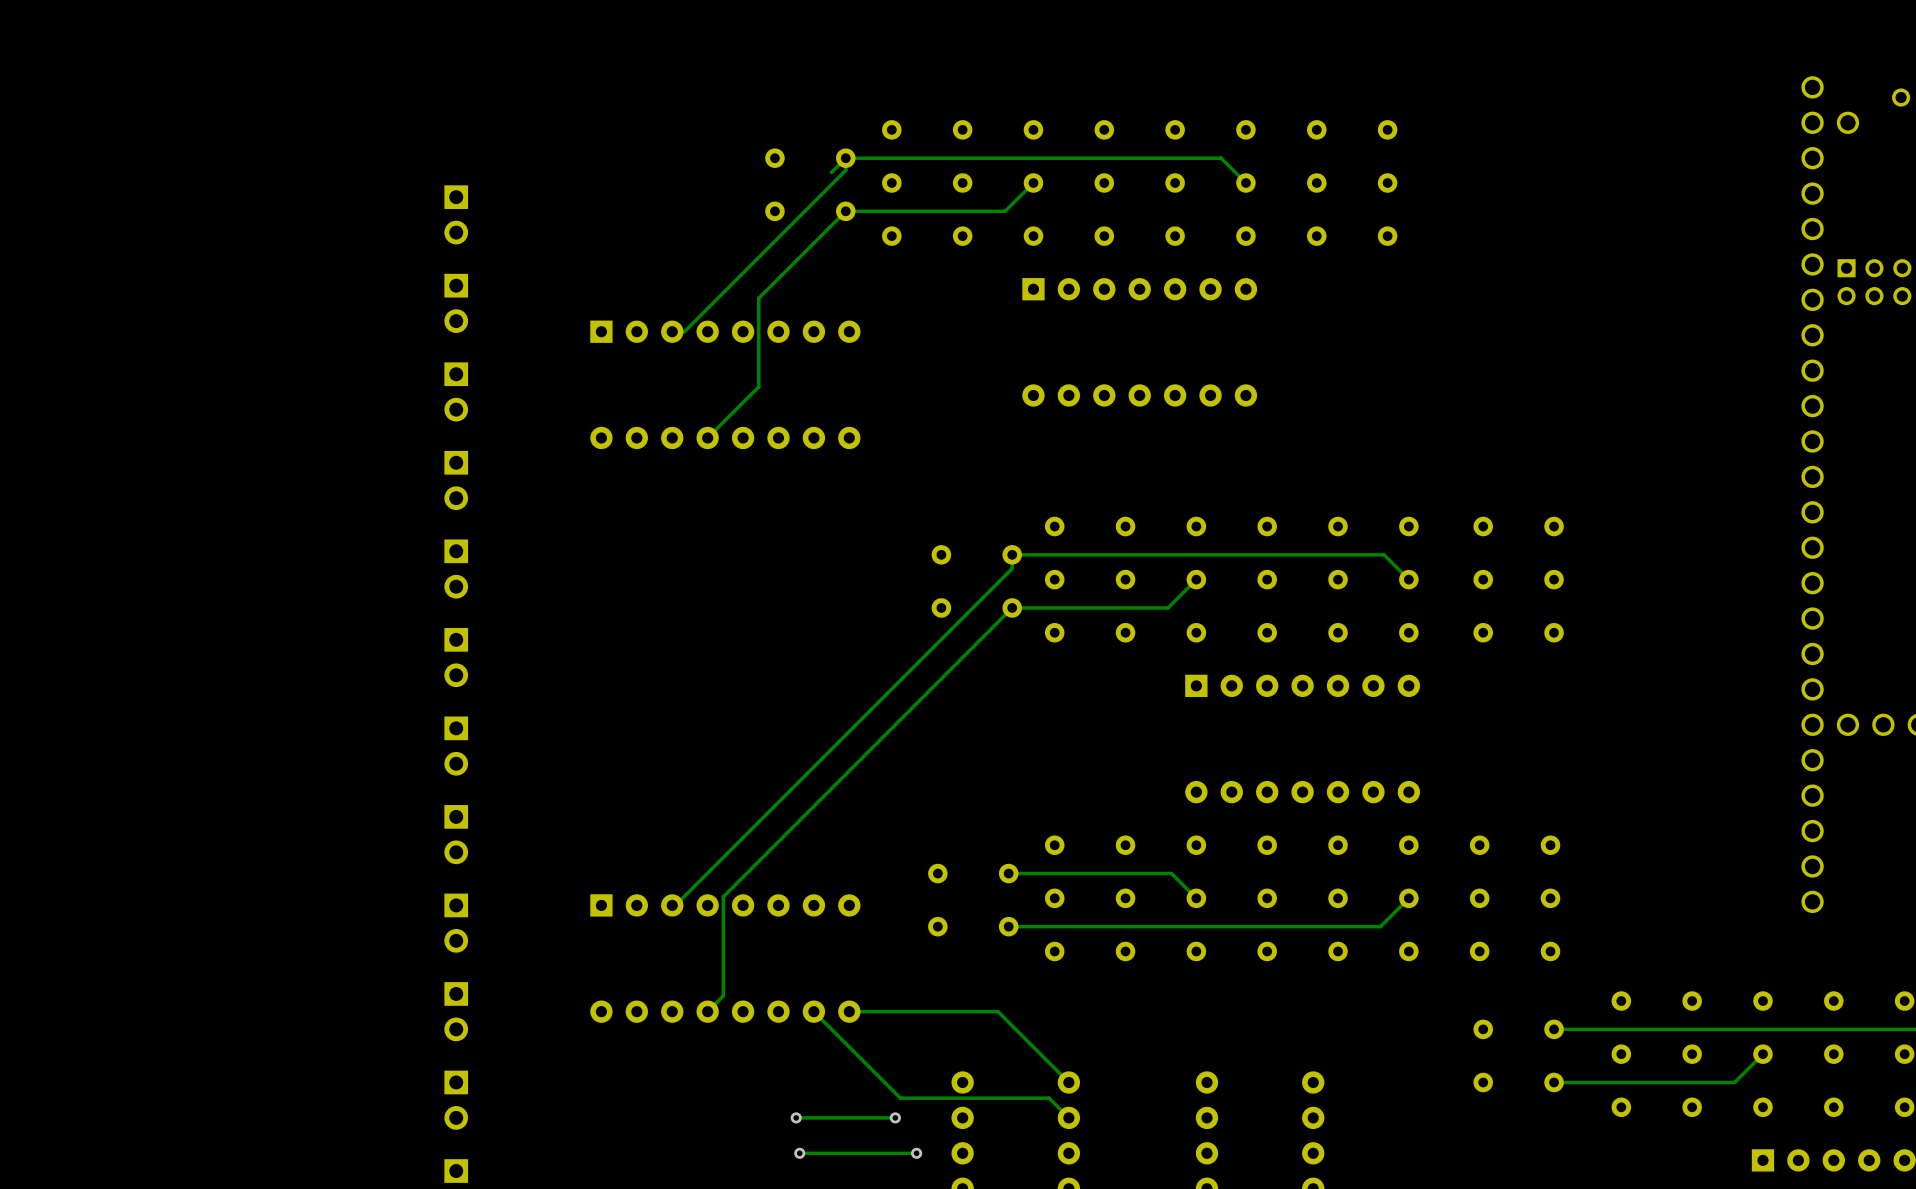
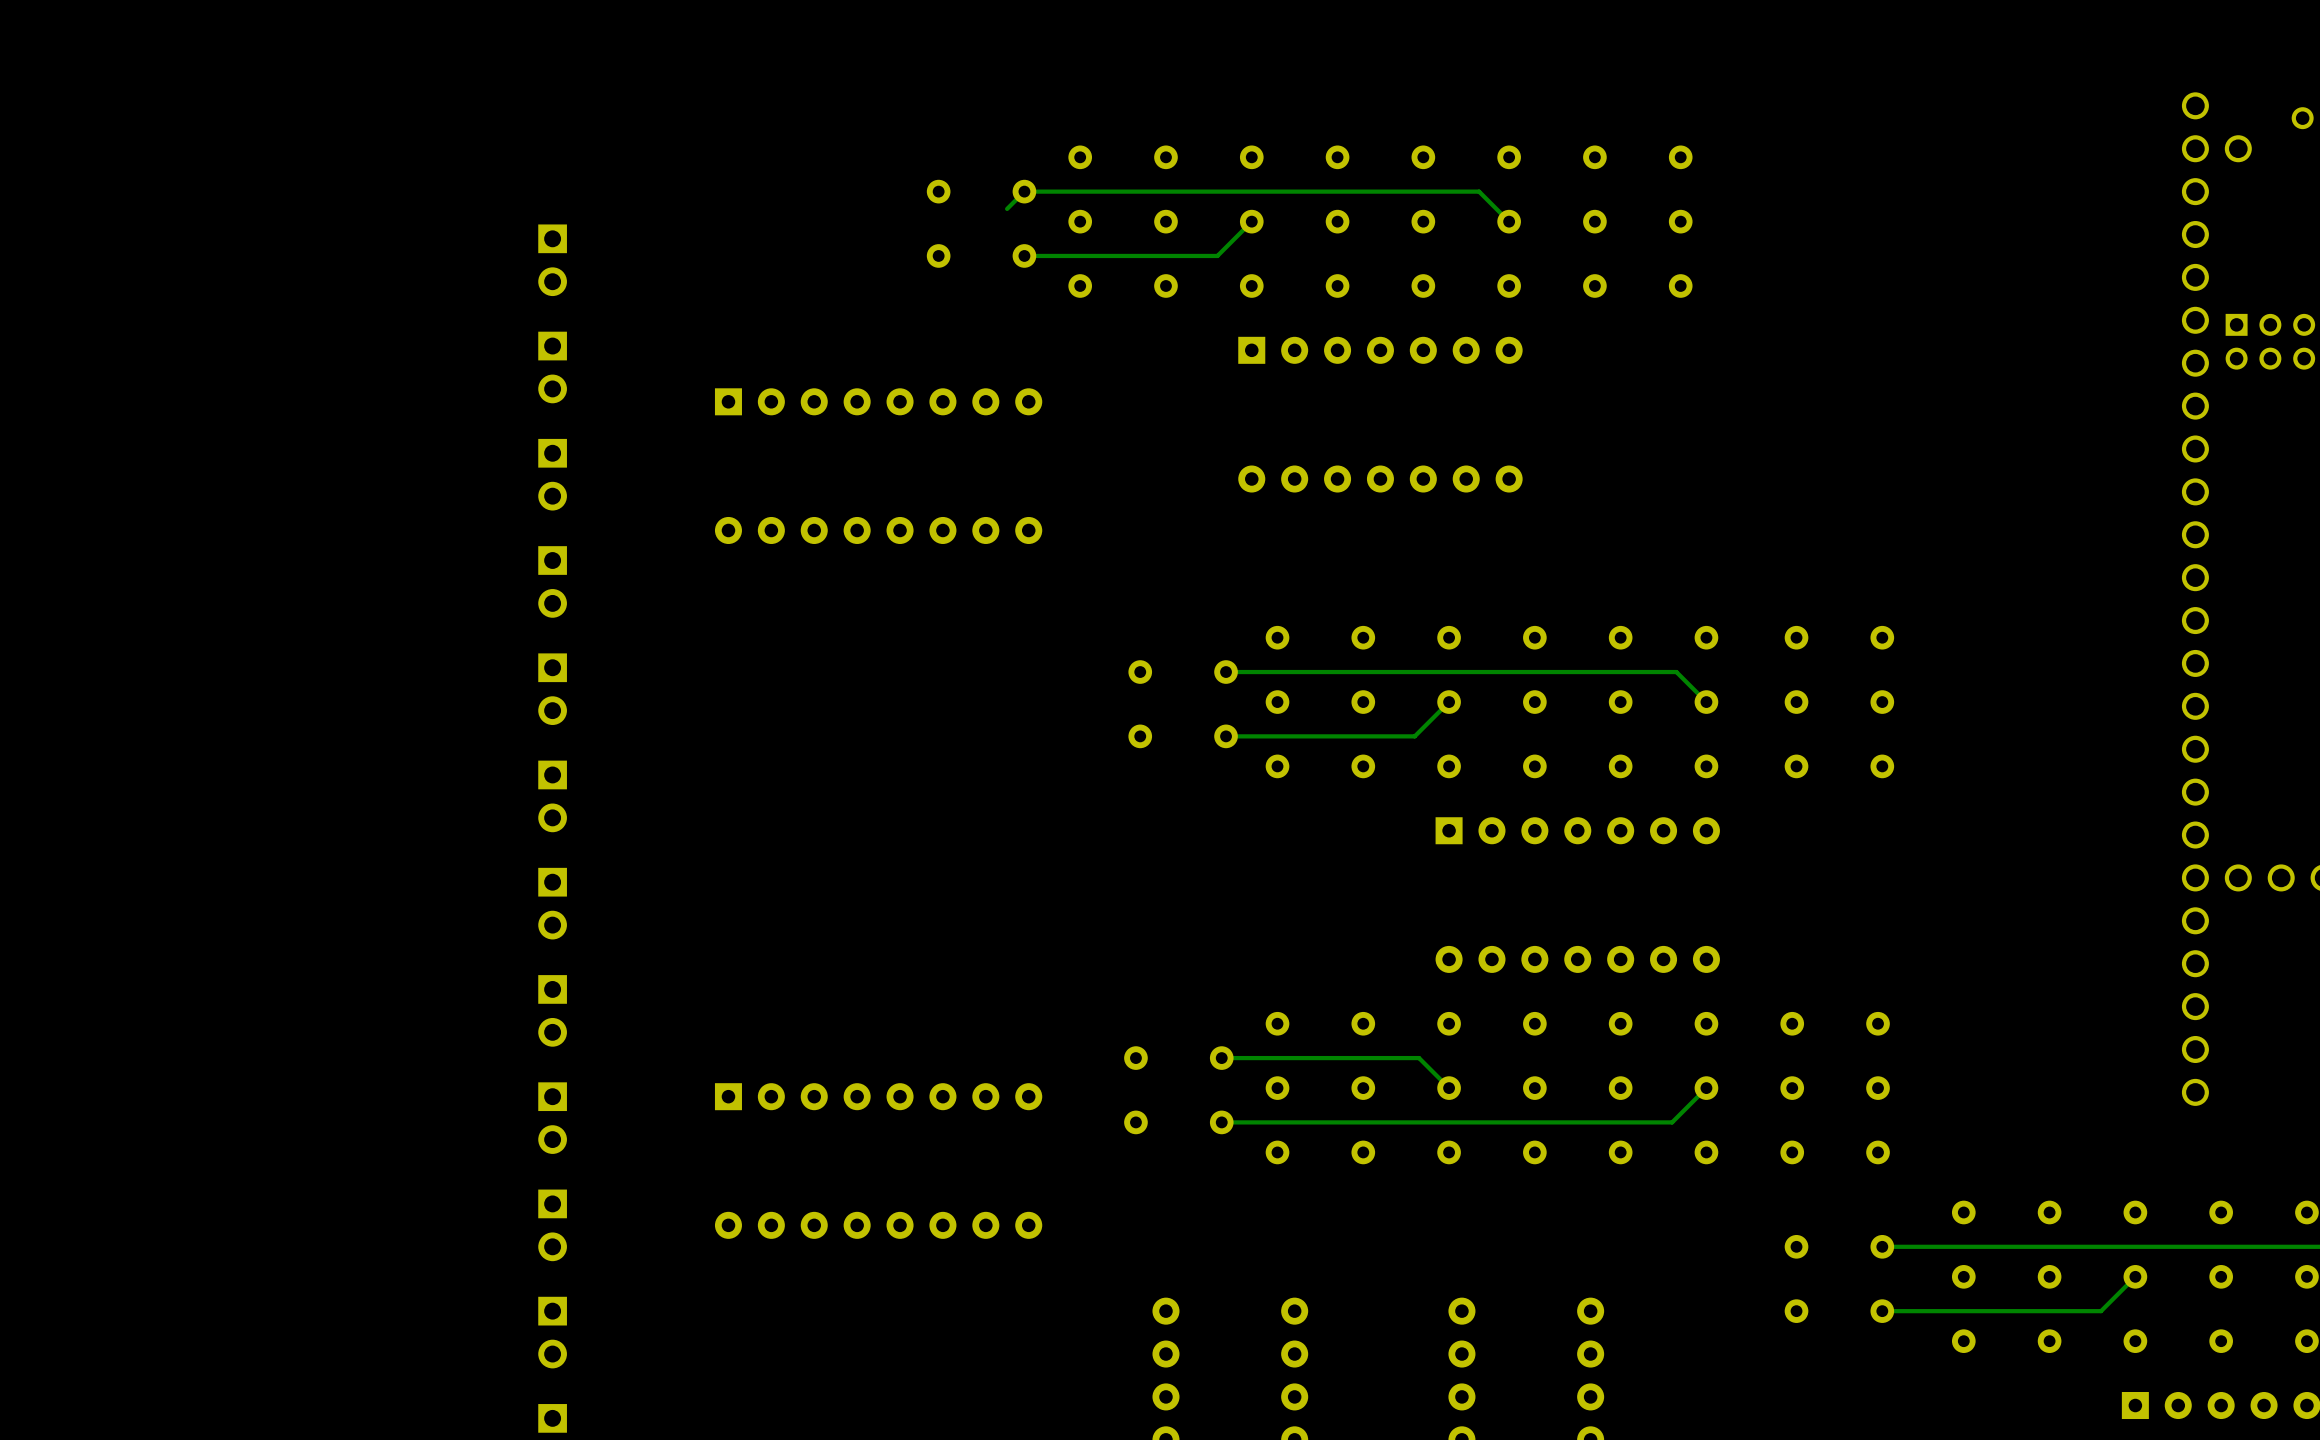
track: (845, 158) (845, 170) (684, 331) (672, 331) -> none
track: (845, 211) (758, 298) (758, 386) (707, 437) -> none
track: (1012, 554) (1012, 568) (675, 905) (672, 905) -> none
track: (1012, 607) (723, 896) (723, 995) (707, 1011) -> none
track: (813, 1011) (900, 1098) (1049, 1098) (1068, 1117) -> none
track: (849, 1011) (998, 1011) (1068, 1082) -> none
via: (796, 1117) -> none
track: (895, 1117) (796, 1117) -> none
via: (895, 1117) -> none
via: (799, 1153) -> none
track: (916, 1153) (799, 1153) -> none
via: (916, 1153) -> none

